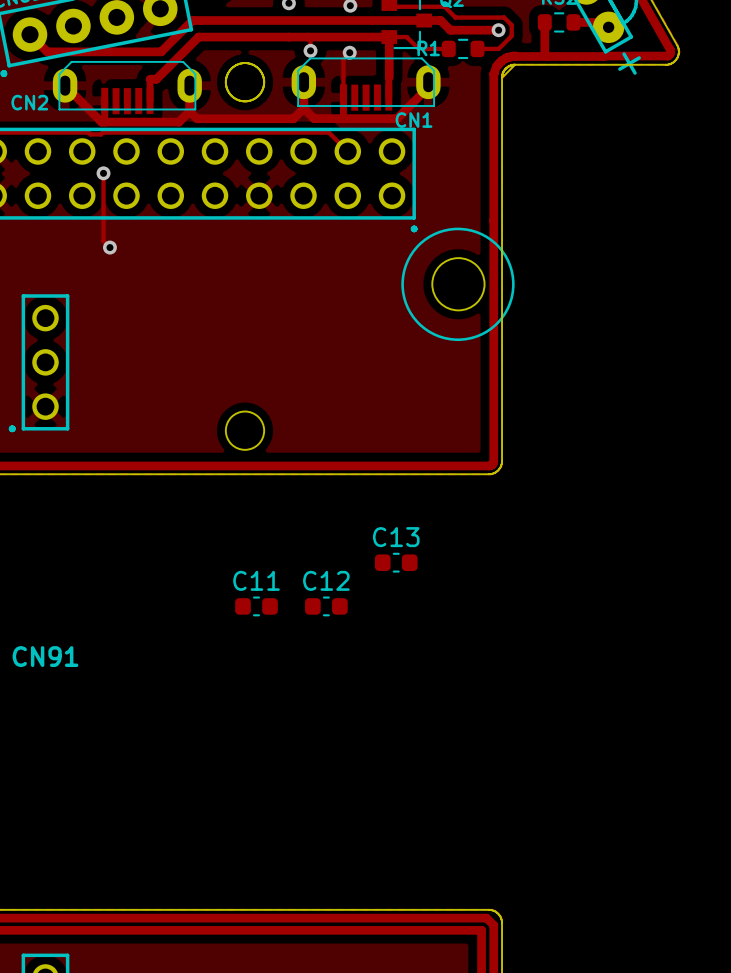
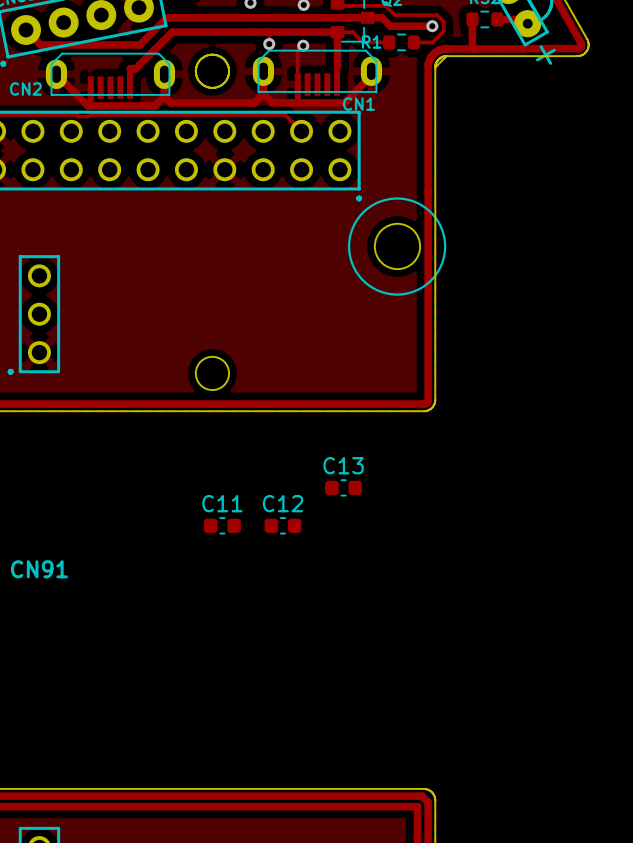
track: (103, 173) (103, 241) (109, 247) -> none
via: (103, 173) -> none
via: (109, 247) -> none

